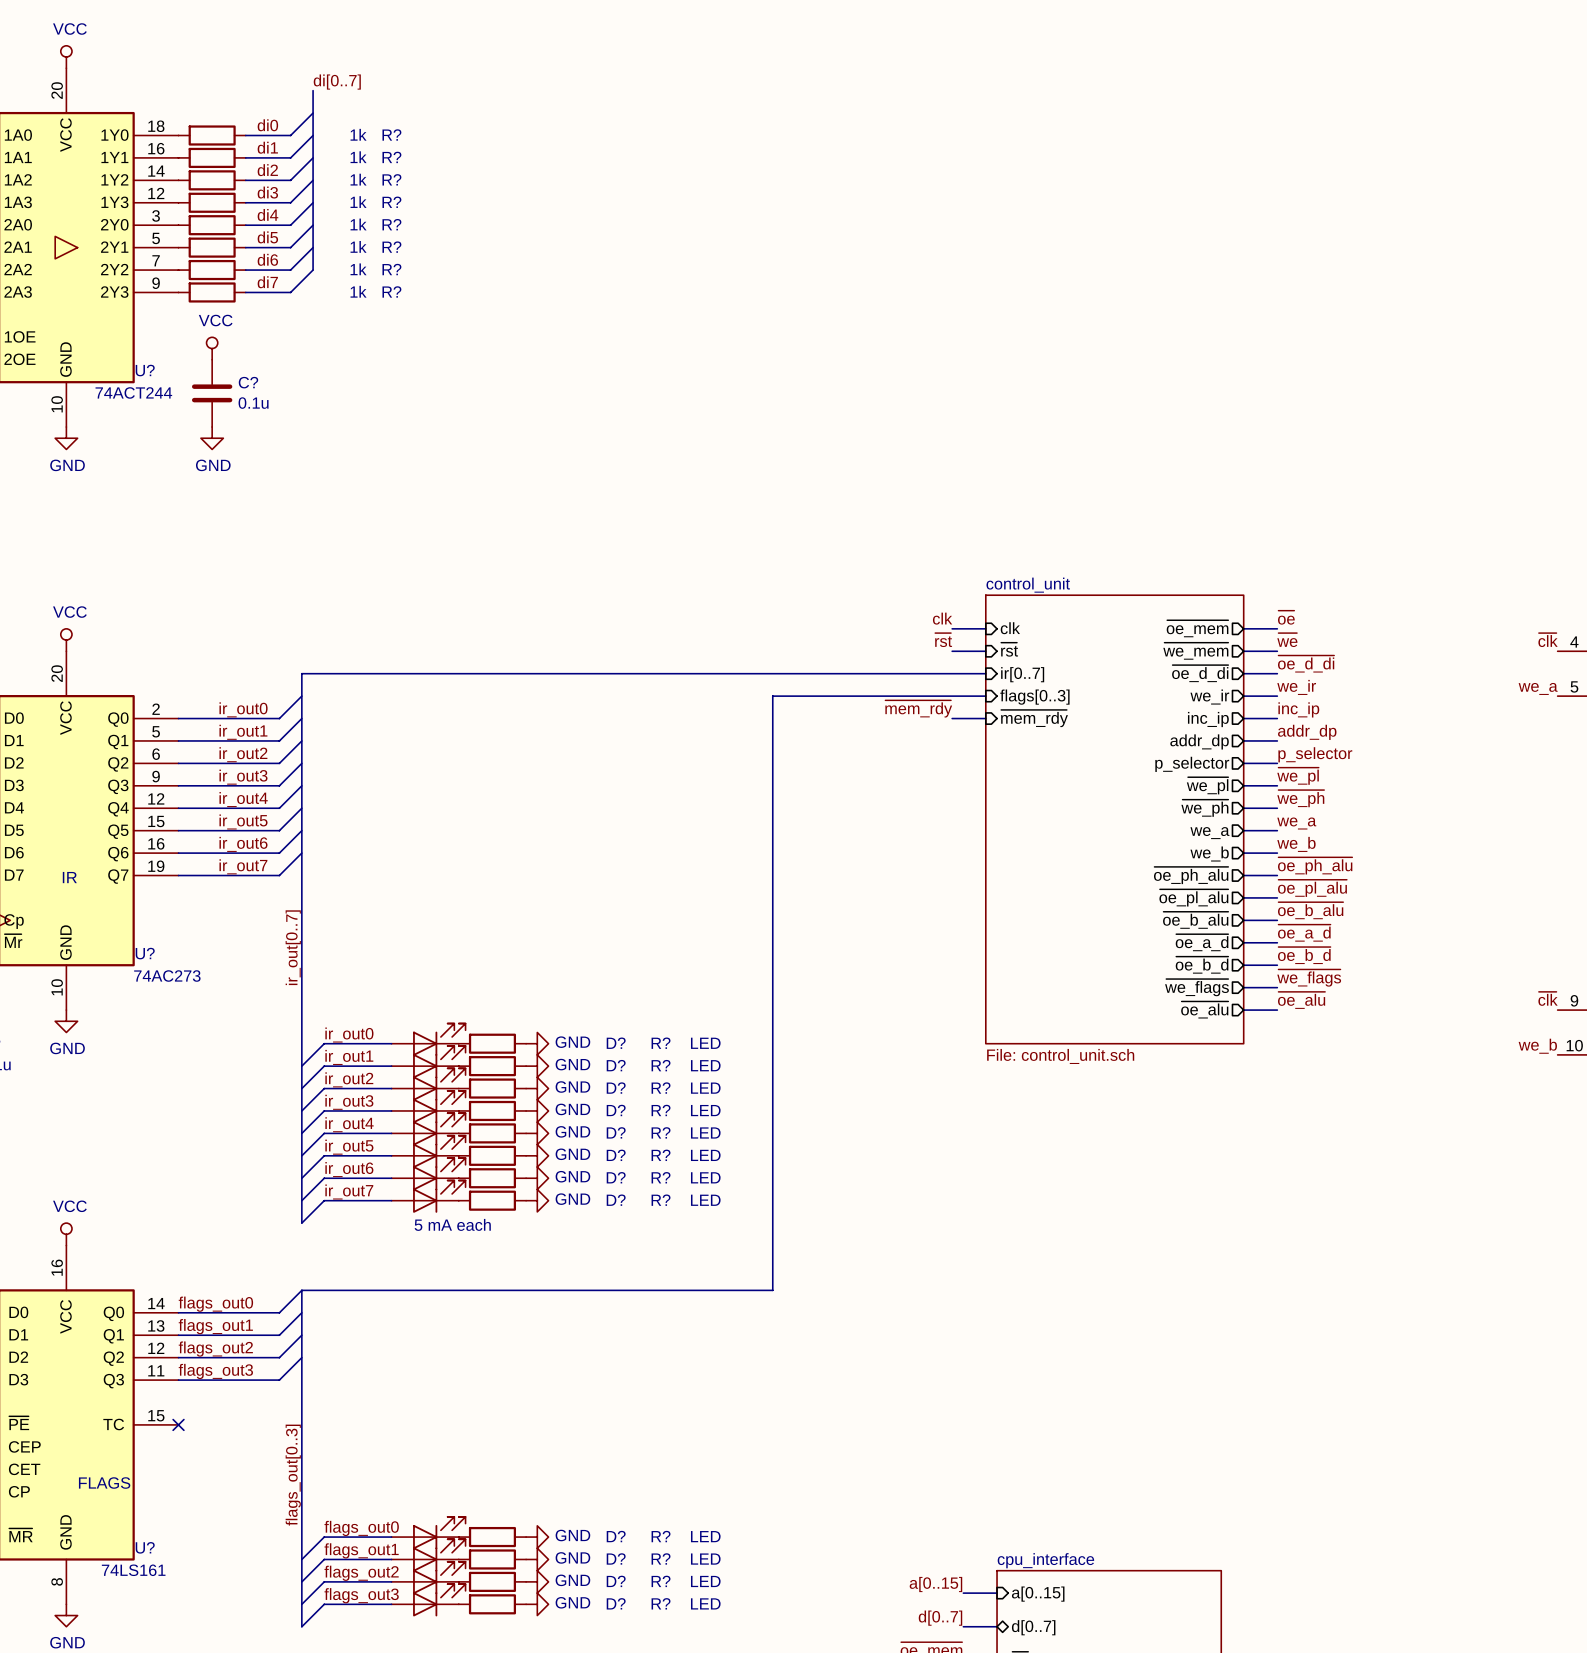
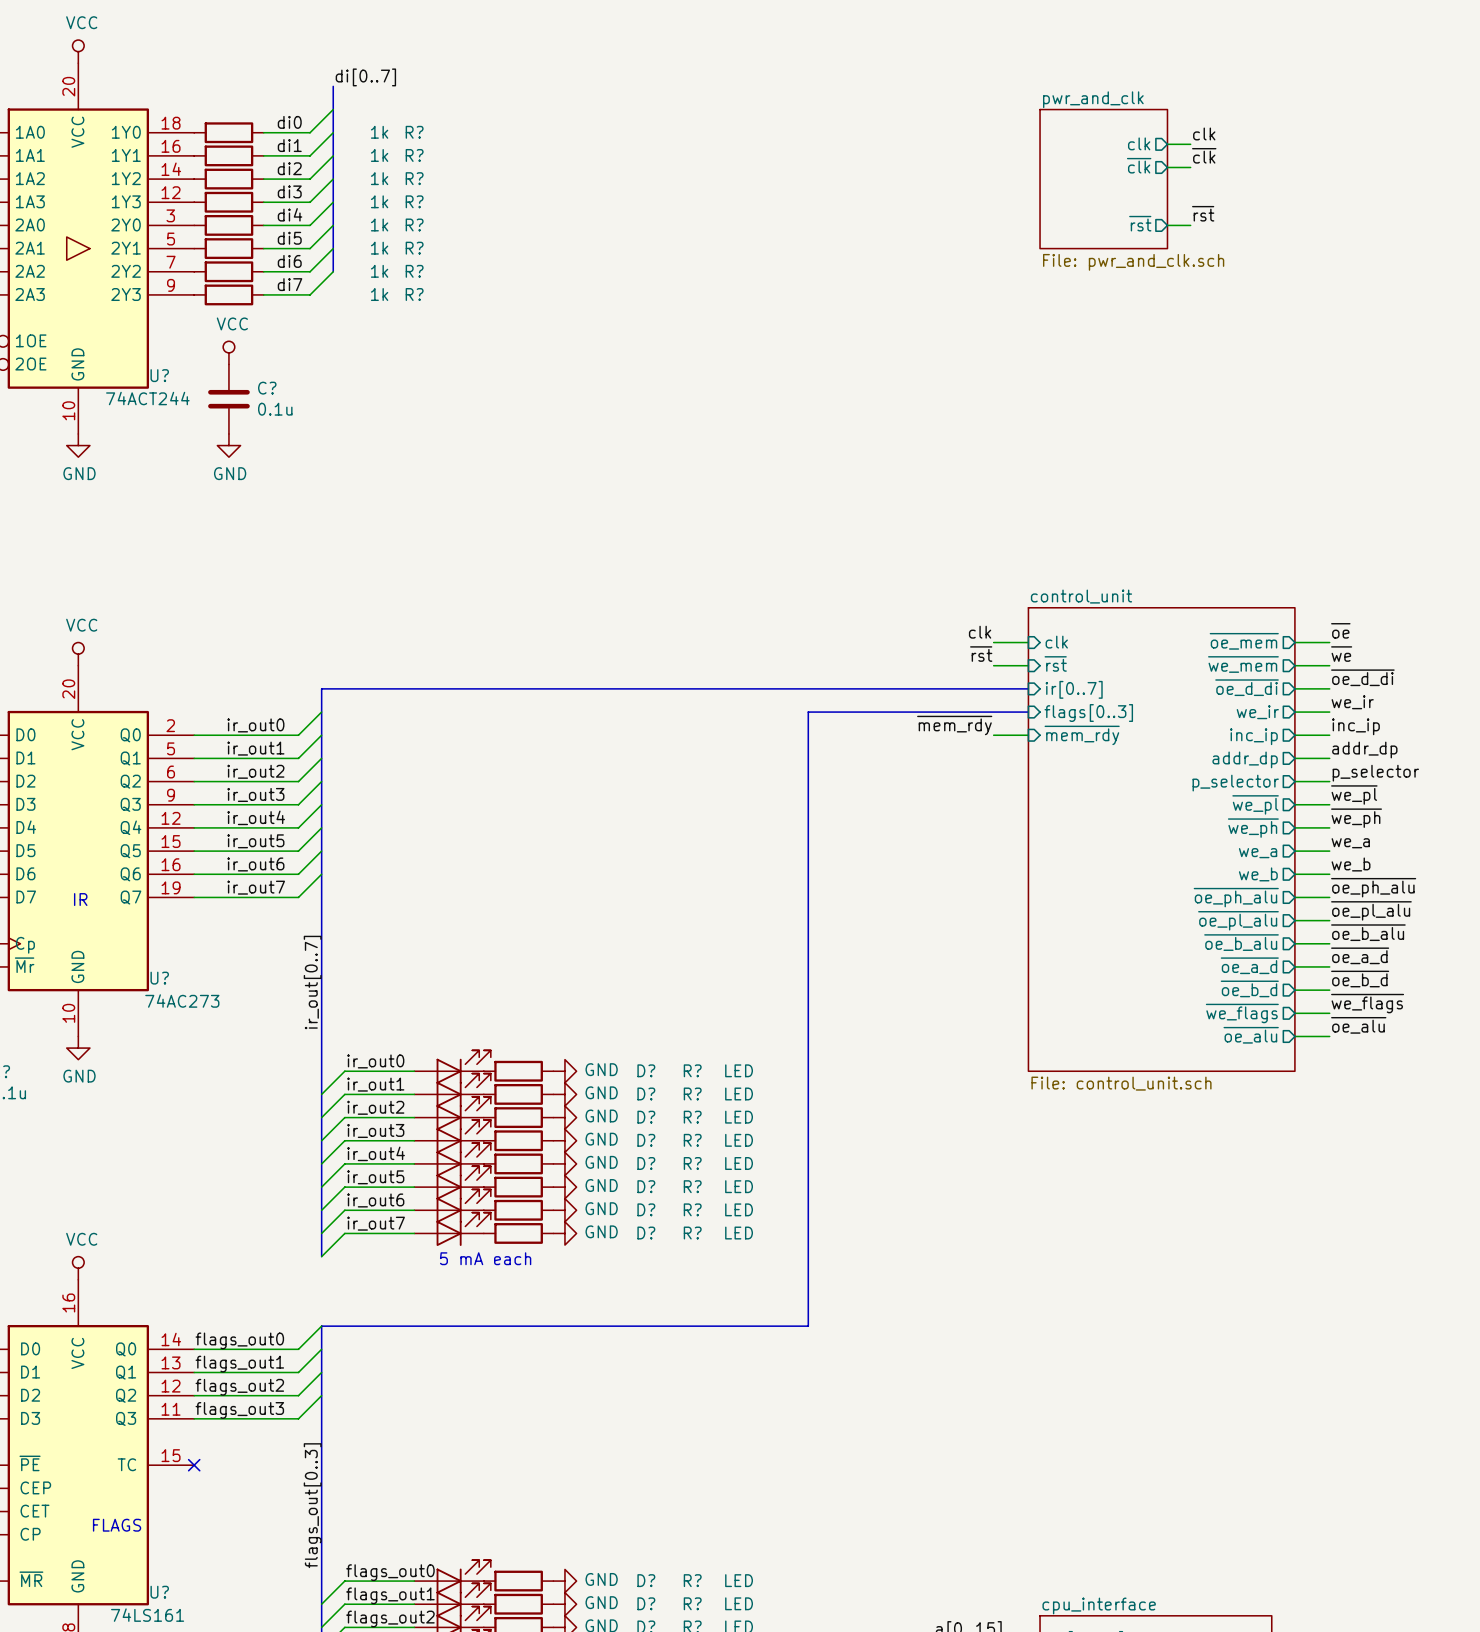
label: none -> clk (1204, 133)
sheet pin: none -> clk (1139, 143)
wire: none -> (1167, 144) (1190, 144)
label: none -> ~{clk} (1204, 155)
sheet pin: none -> ~{clk} (1139, 165)
wire: none -> (1167, 167) (1190, 167)
sheet pwr_and_clk: none -> File: pwr_and_clk.sch (1103, 179)
label: none -> ~{rst} (1203, 213)
sheet pin: none -> ~{rst} (1140, 223)
wire: none -> (1167, 225) (1190, 225)

